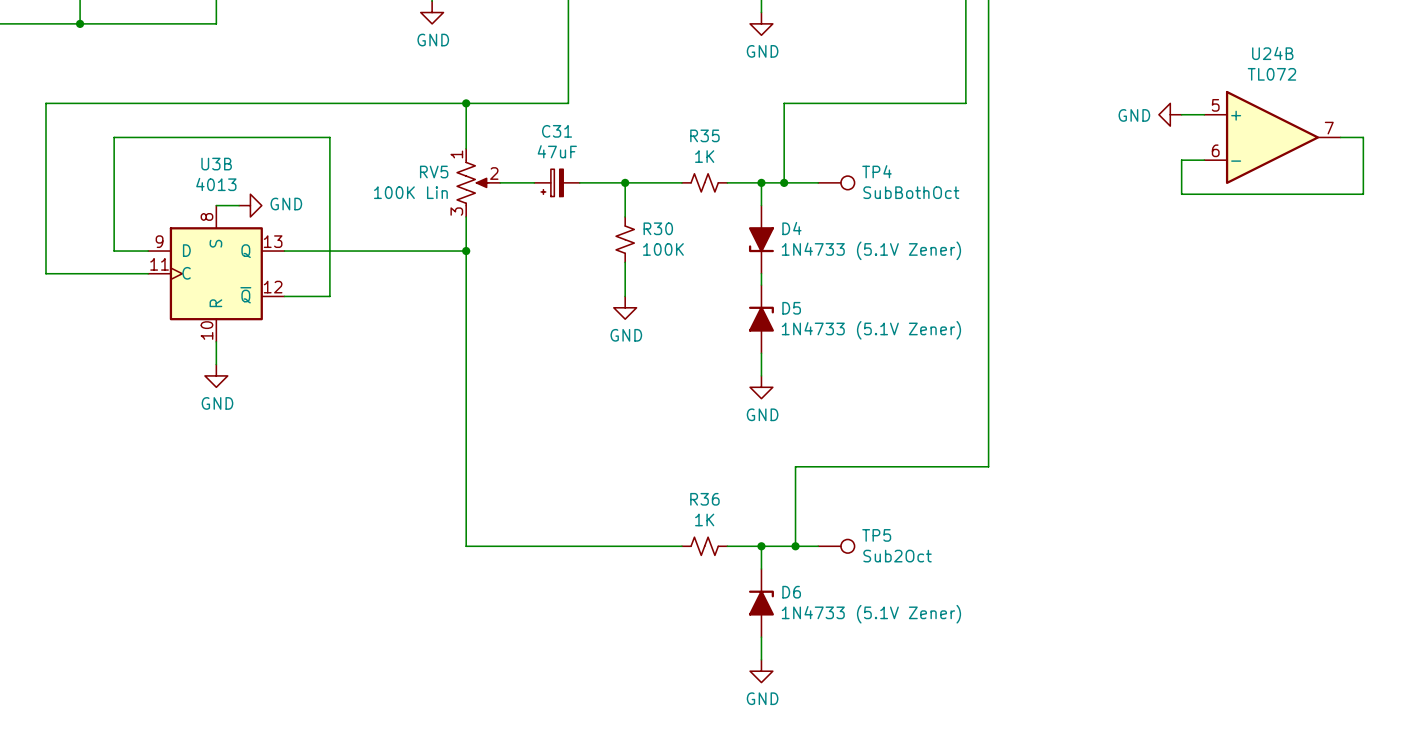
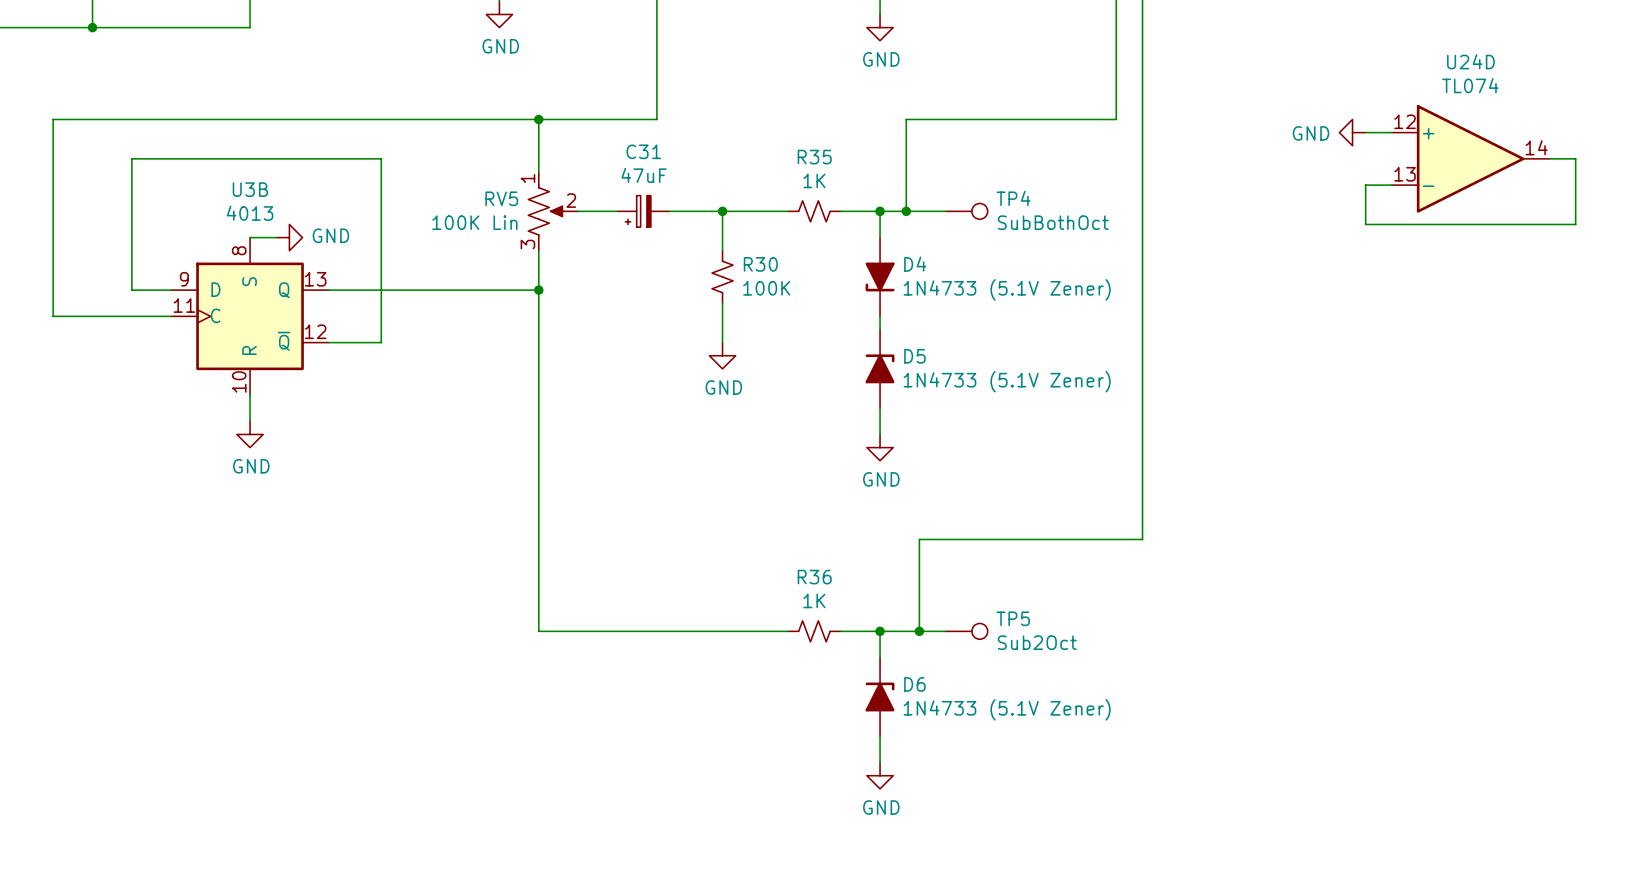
U24B name: U24B (1272, 53) -> U24D (1470, 61)
U24B value: TL072 (1271, 74) -> TL074 (1470, 85)
U24B pin number: 5 (1215, 105) -> 12 (1405, 121)
U24B pin number: 7 (1329, 128) -> 14 (1536, 147)
U24B pin number: 6 (1215, 150) -> 13 (1405, 174)

